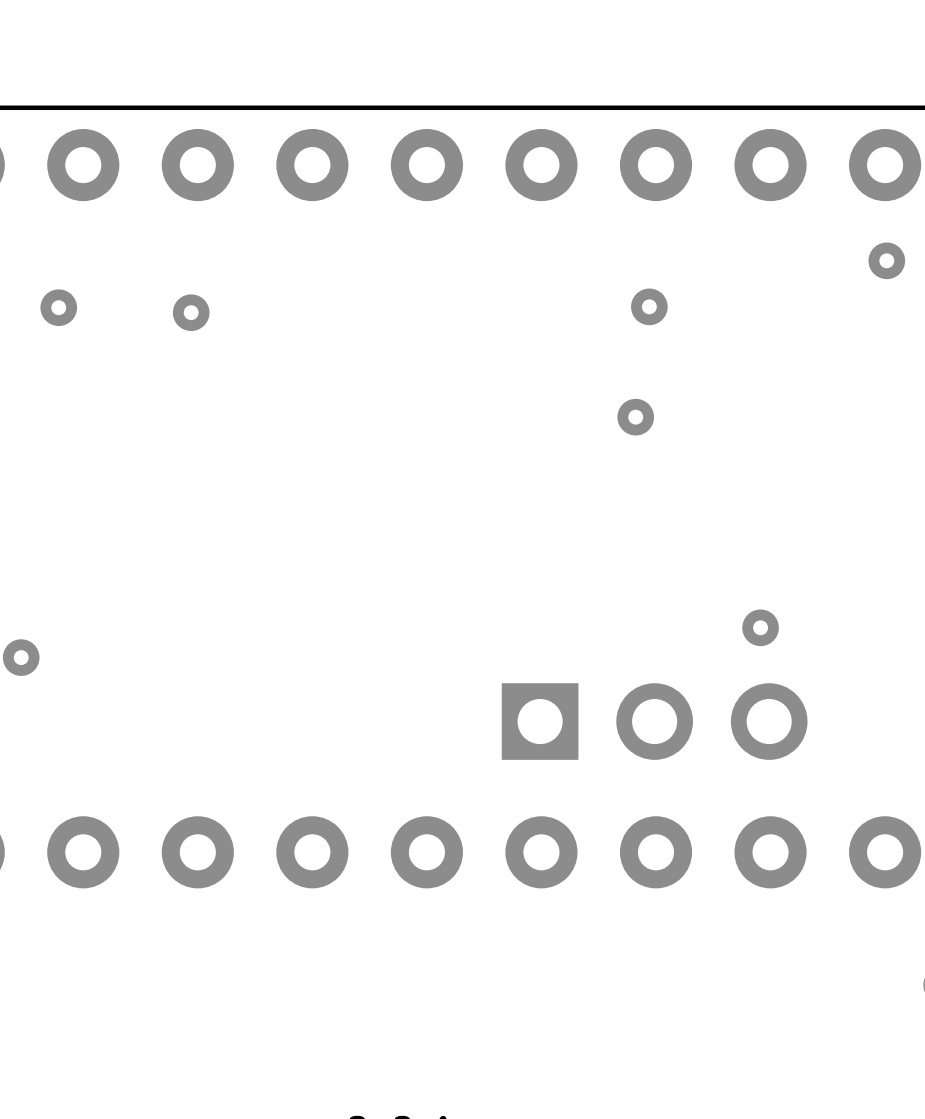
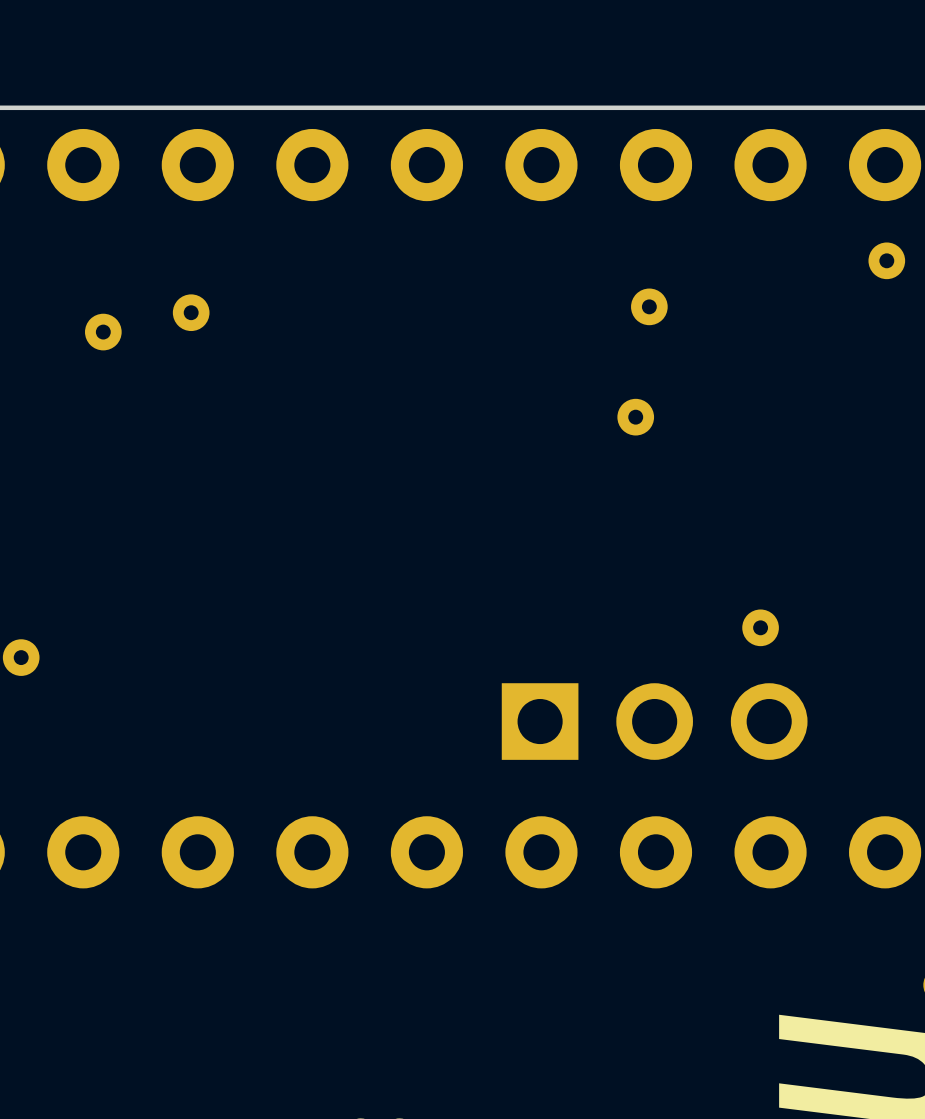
part position: (58, 307) -> (103, 332)

